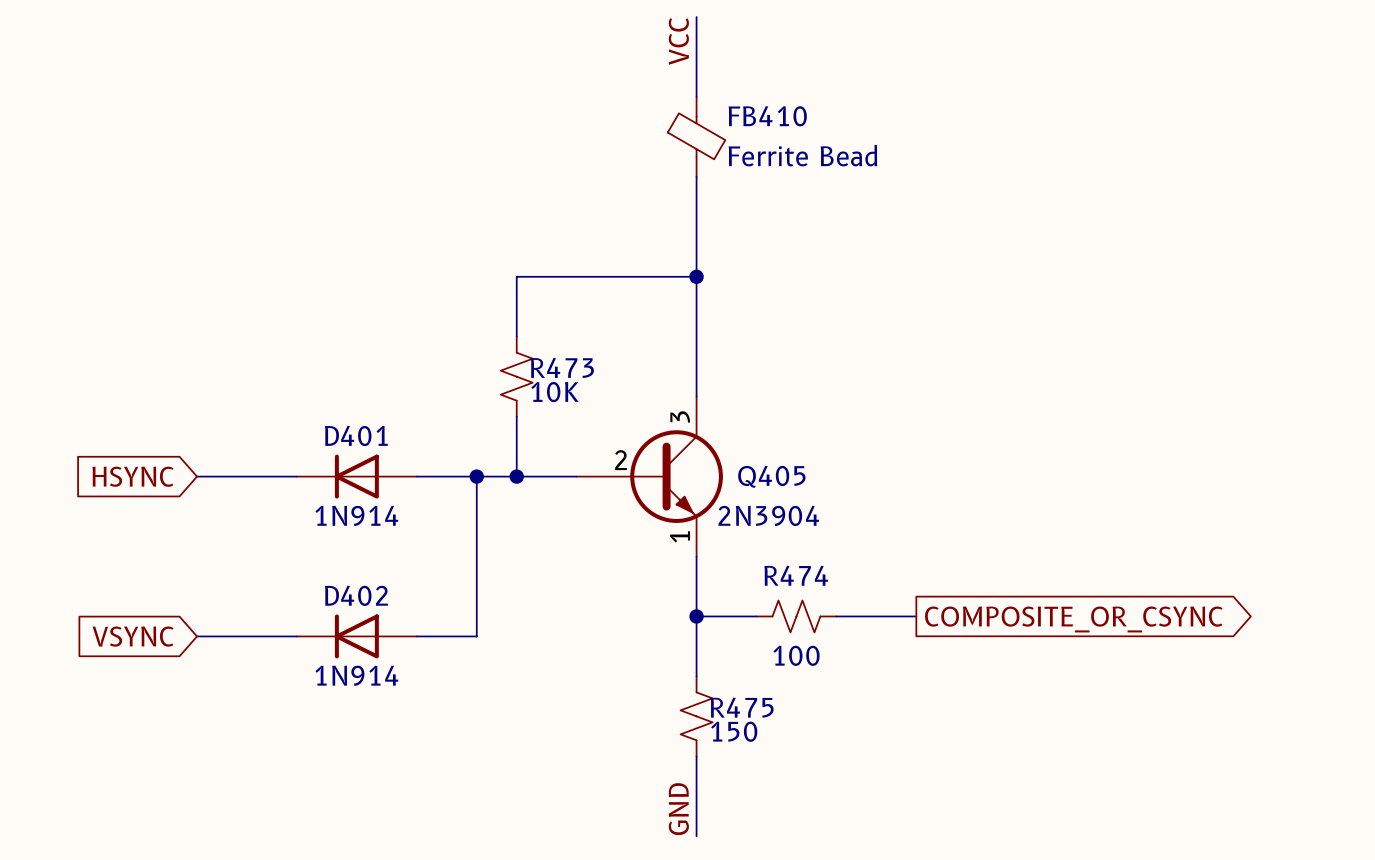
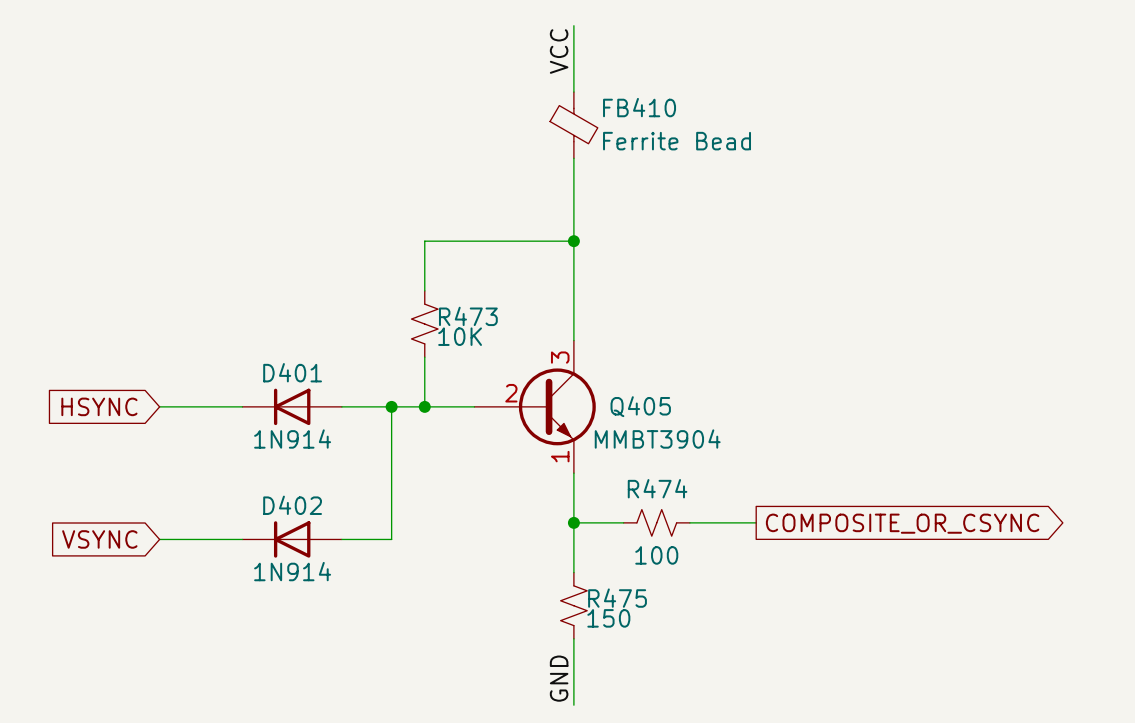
Q405 value: 2N3904 (768, 515) -> MMBT3904 (657, 439)

